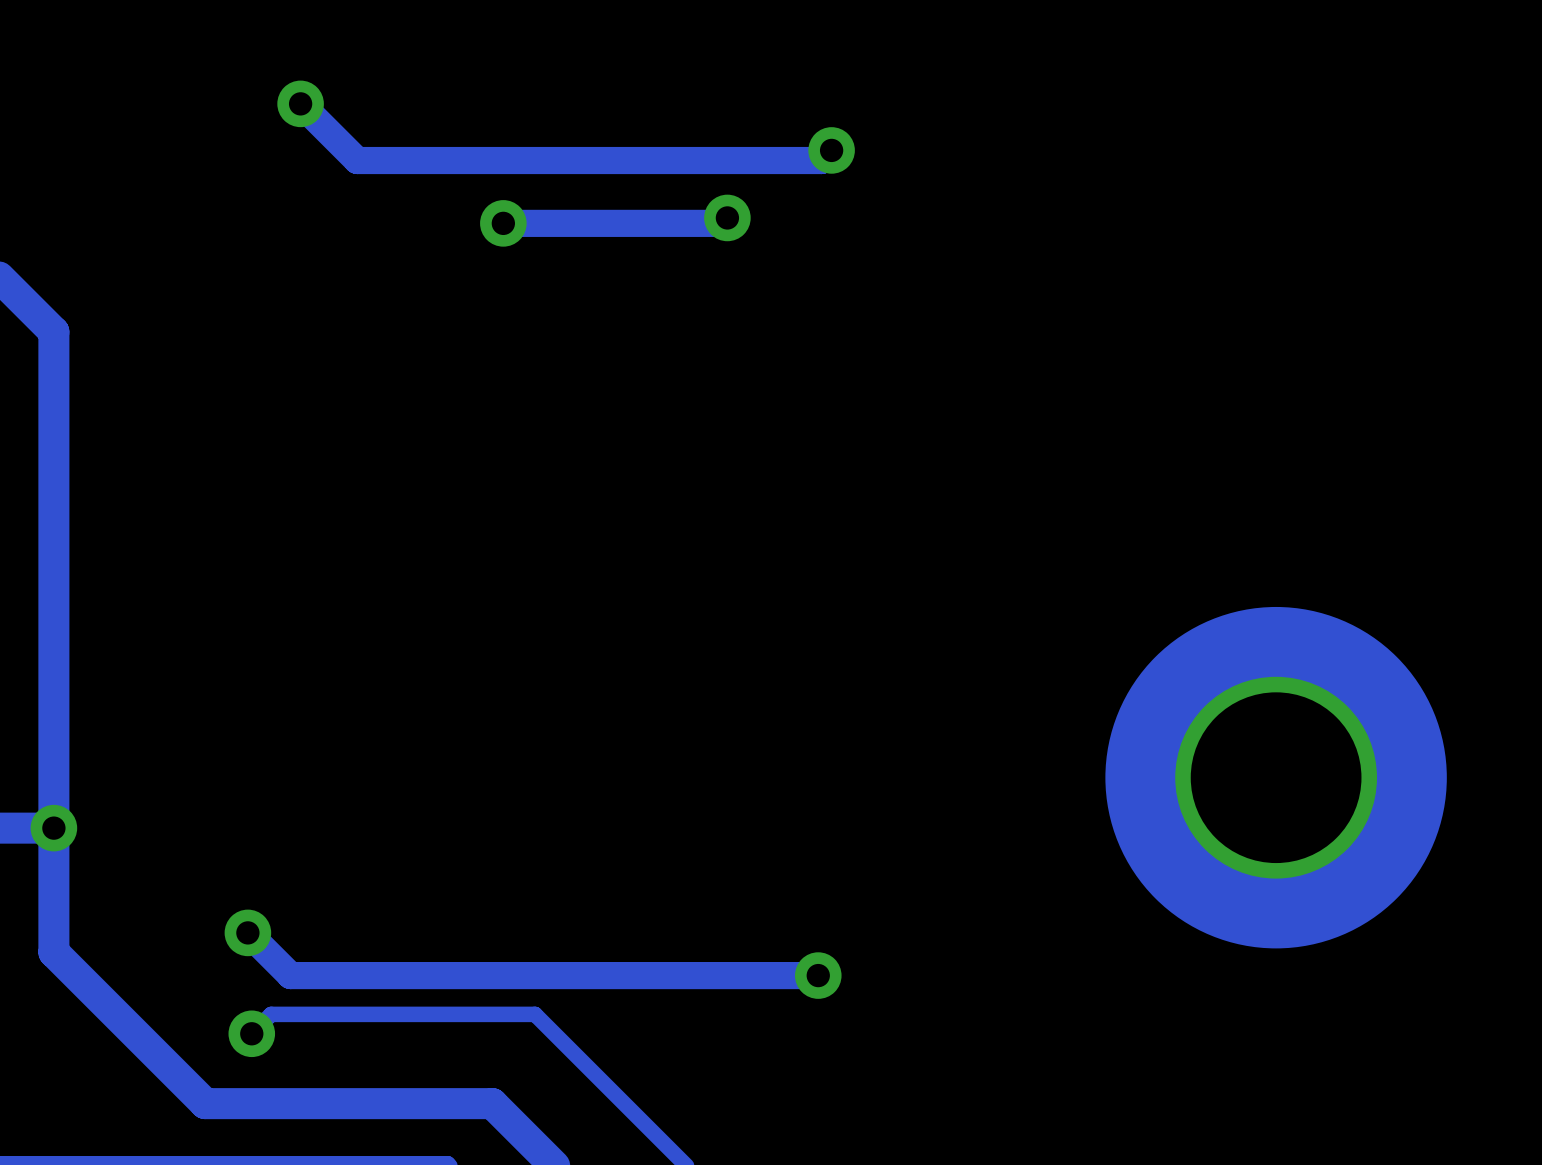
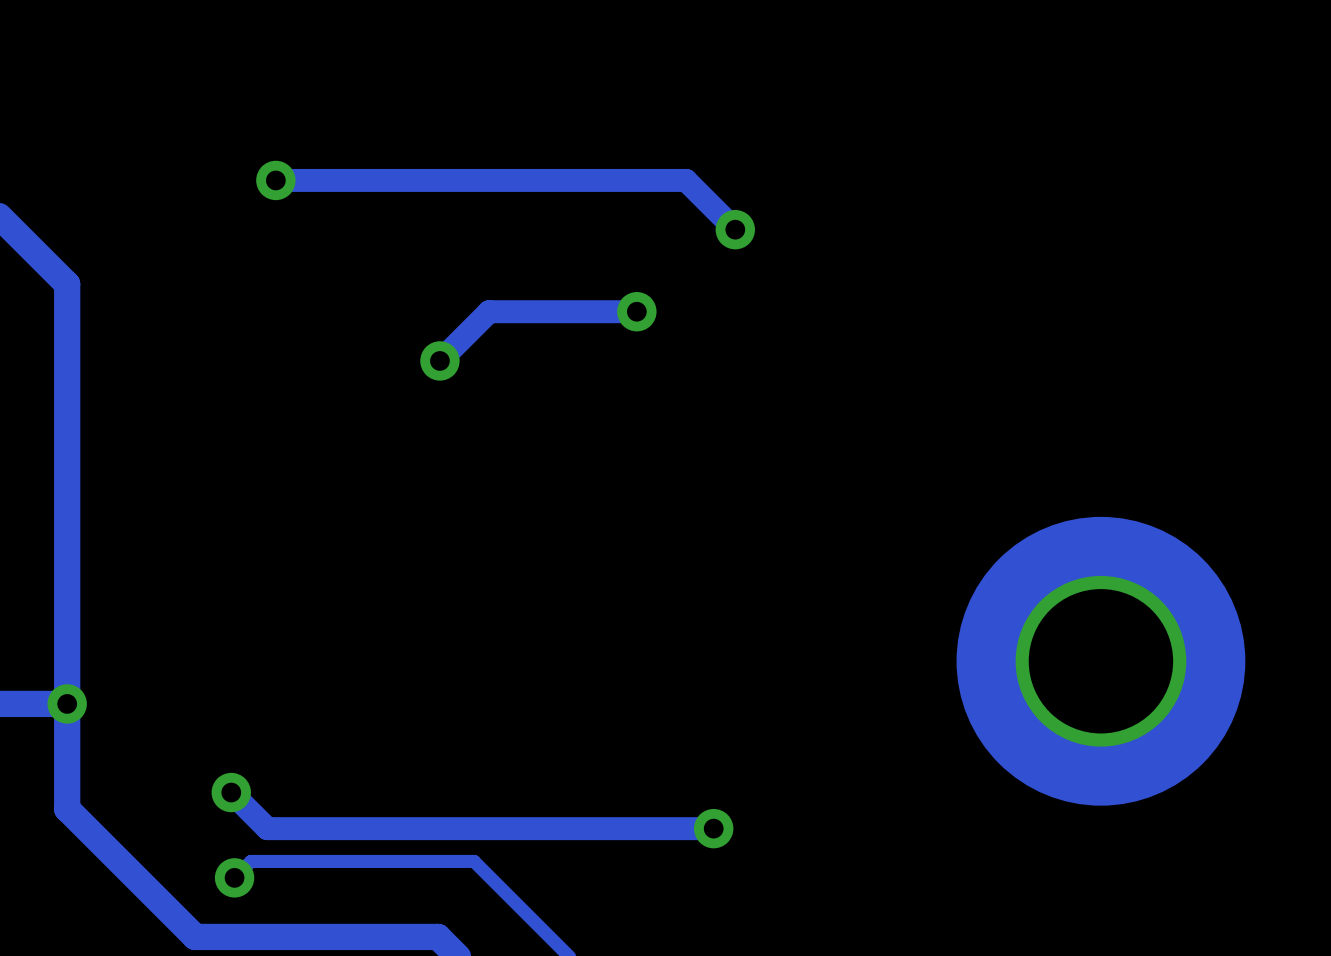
track: (300, 103) (357, 160) (821, 160) (831, 150) -> none
via: (300, 103) -> none
via: (831, 150) -> none
track: none -> (275, 180) (686, 180) (735, 229)
via: none -> (275, 180)
track: (727, 217) (721, 223) (503, 223) -> none
via: (727, 217) -> none
via: (503, 223) -> none
via: none -> (735, 229)
track: none -> (636, 311) (489, 311) (439, 360)
via: none -> (636, 311)
via: none -> (439, 360)

